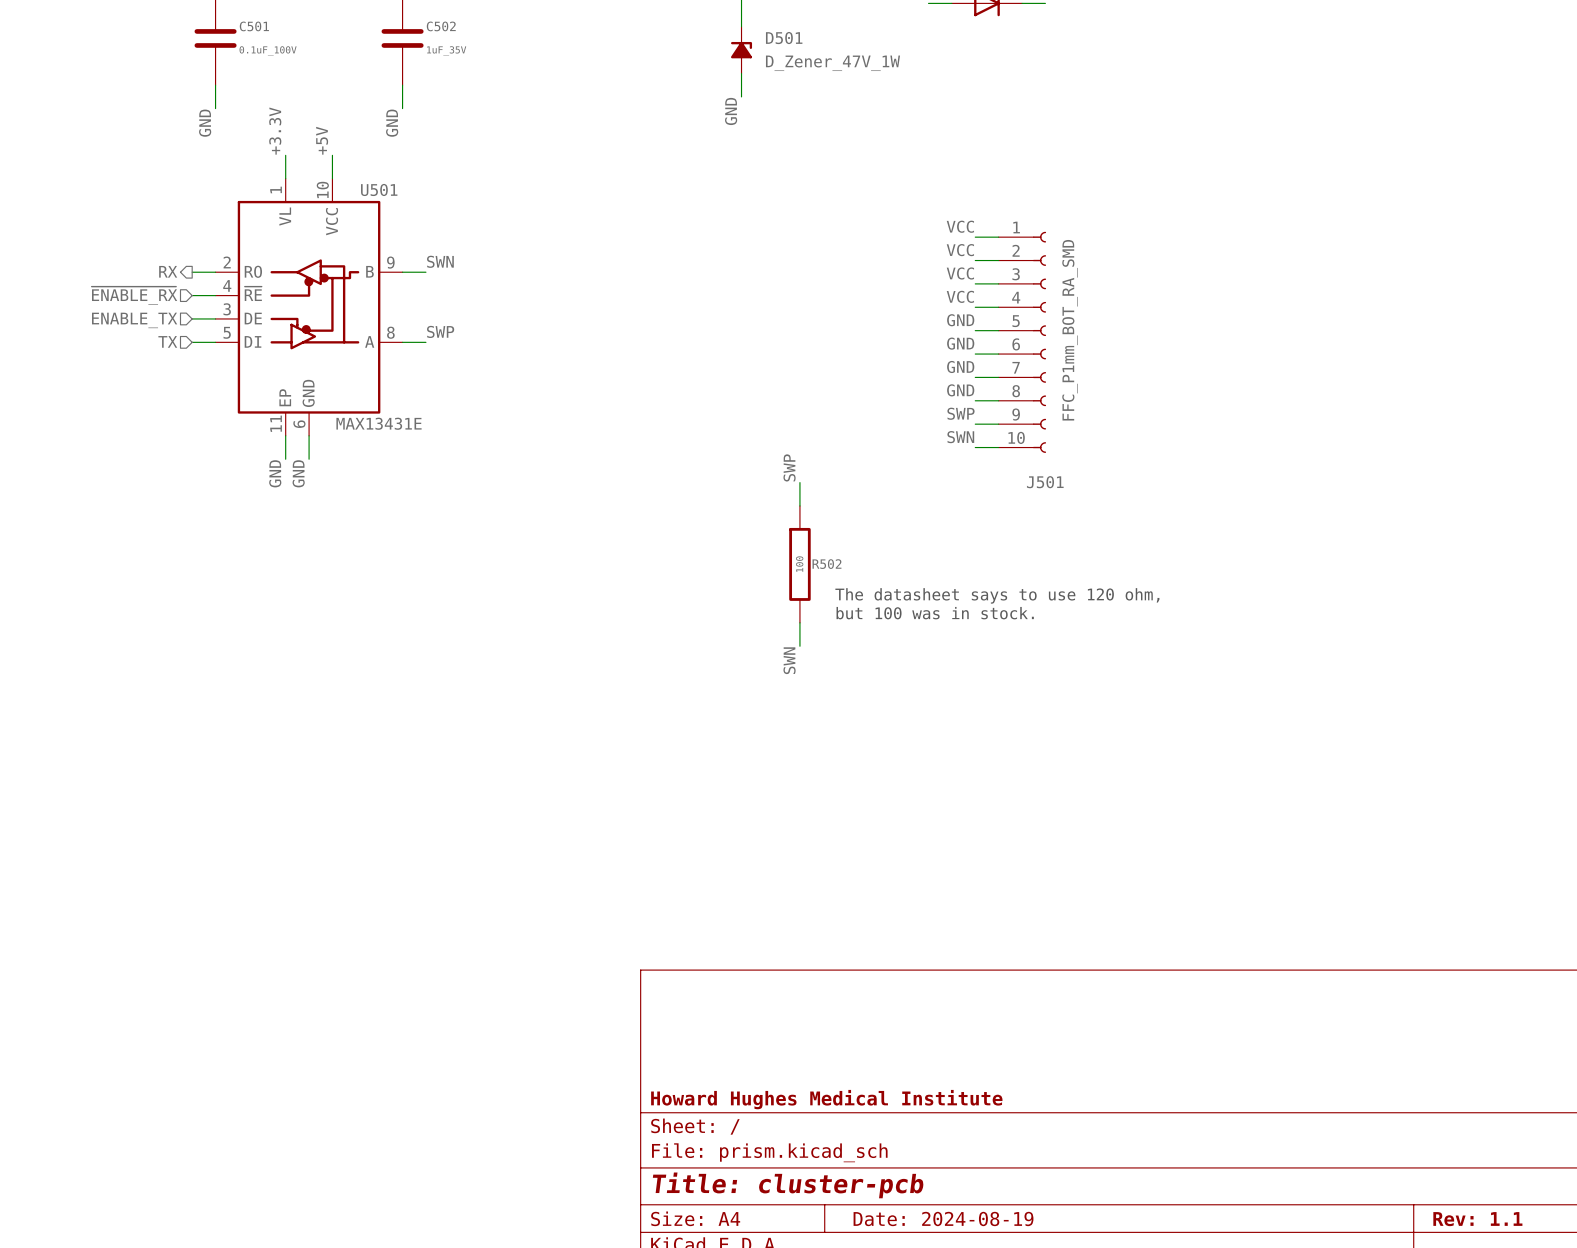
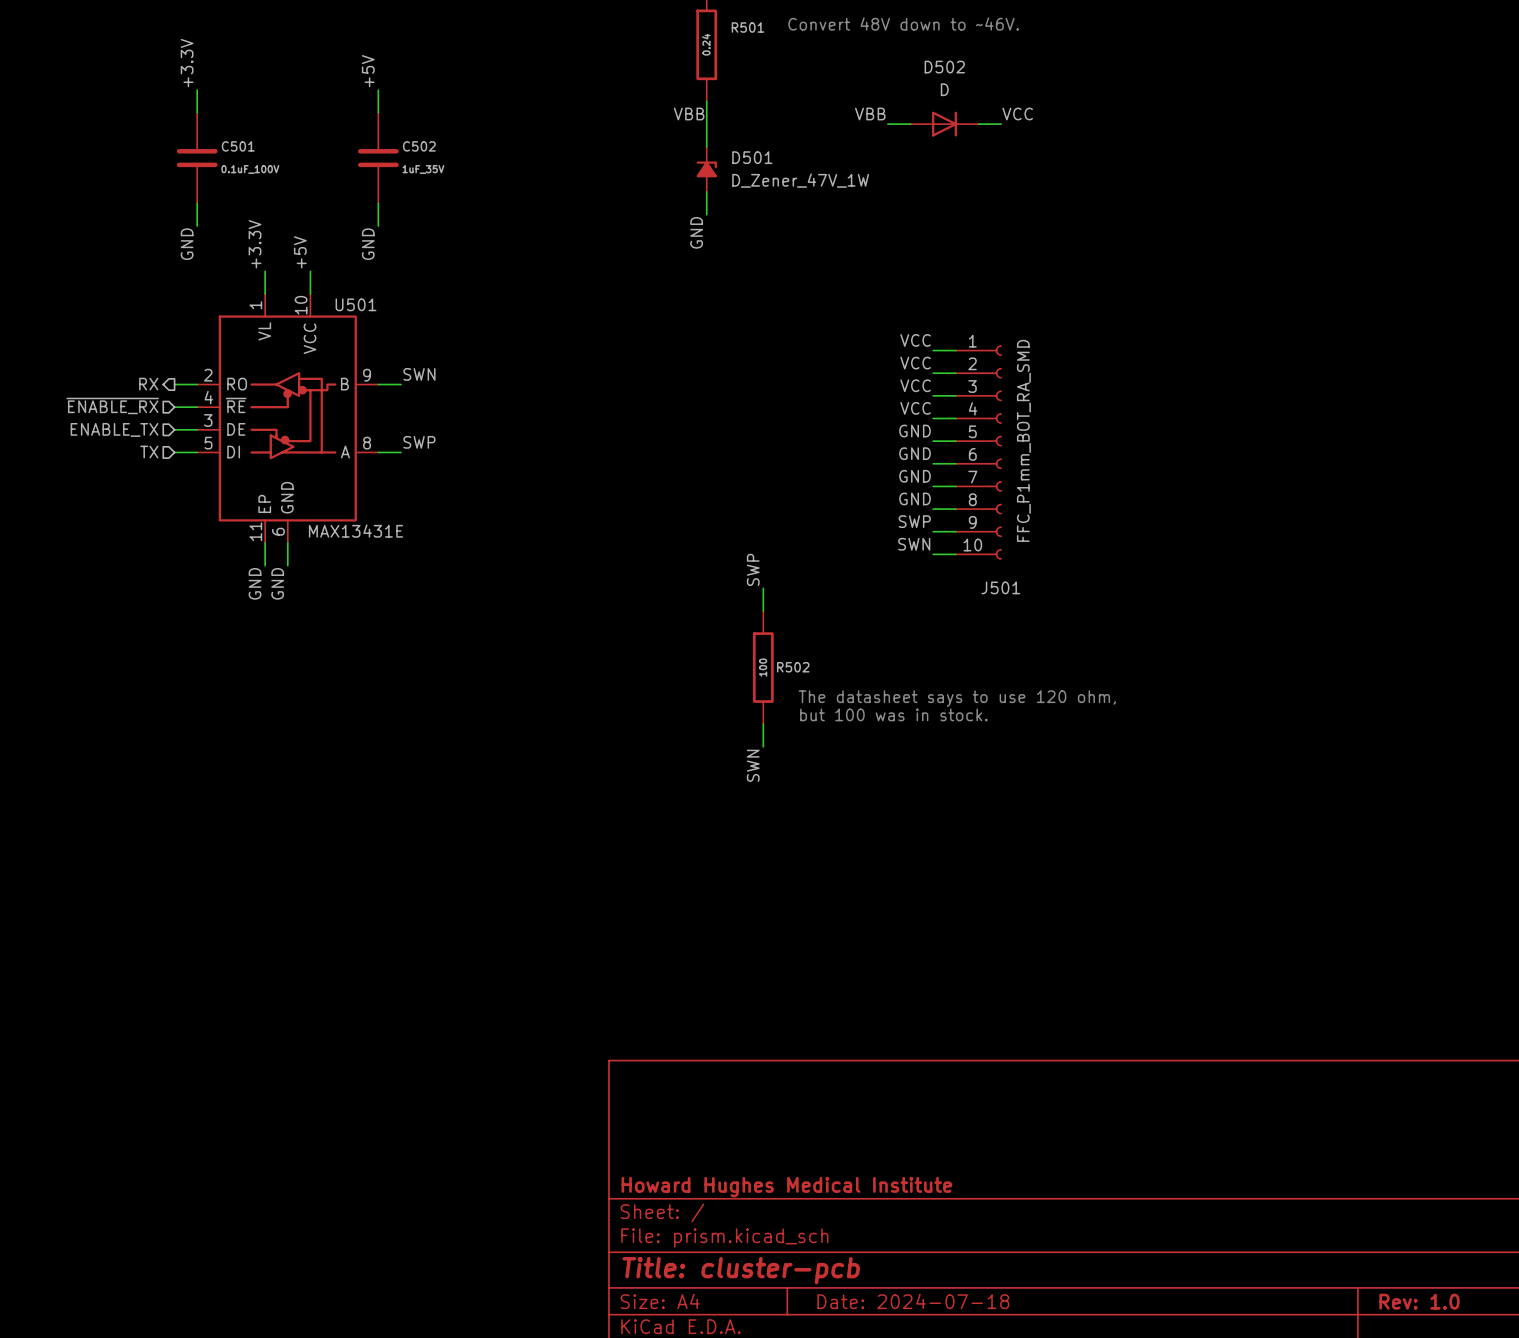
title block: Date: 2024-08-19 (943, 1218) -> Date: 2024-07-18 (913, 1301)
title block: Rev: 1.1 (1477, 1219) -> Rev: 1.0 (1419, 1301)

